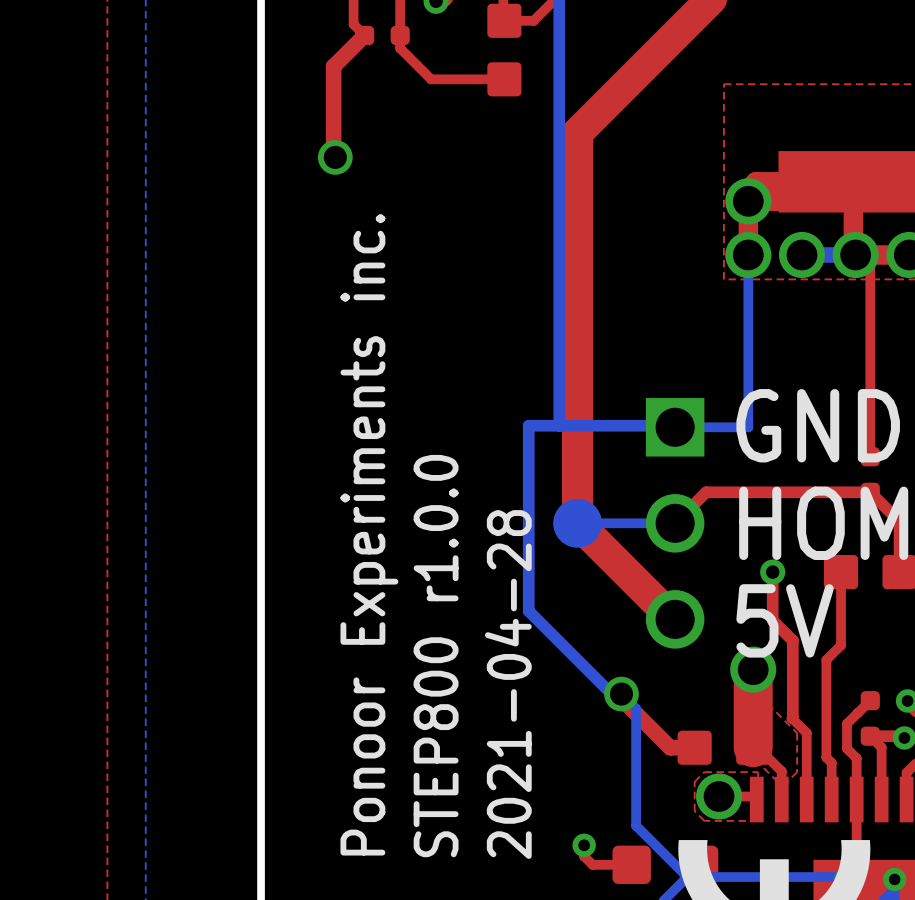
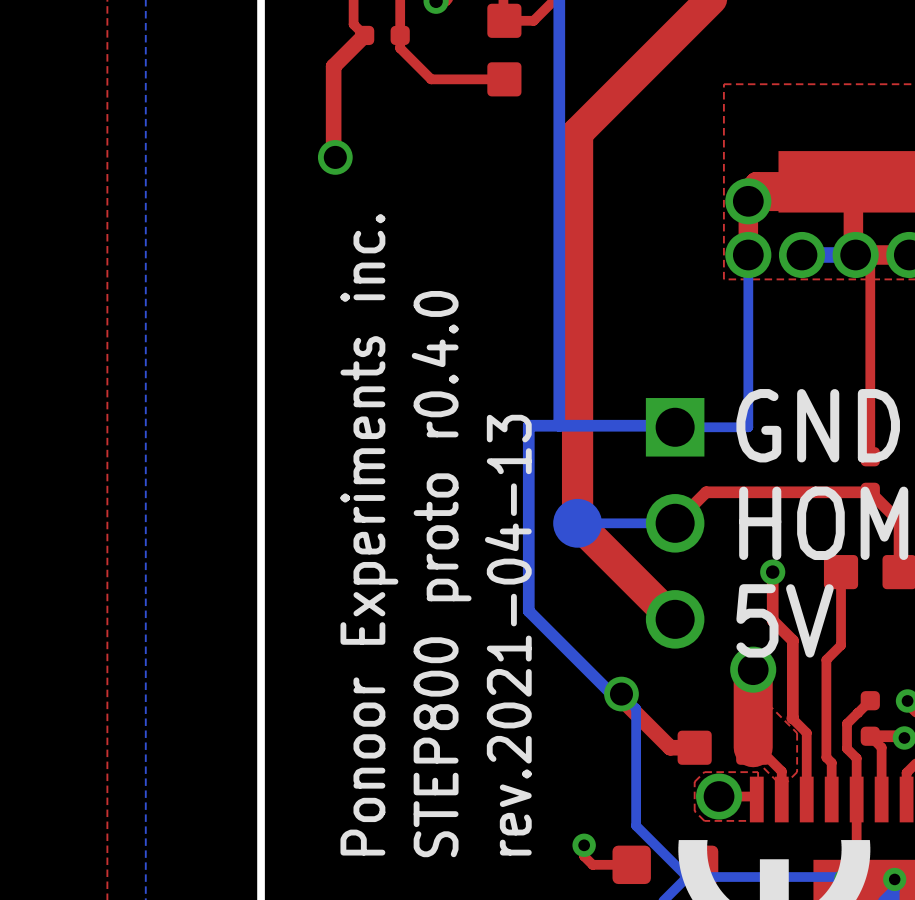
text: STEP800 r1.0.0 (436, 656) -> STEP800 proto r0.4.0 (441, 574)
text: 2021-04-28 (508, 684) -> rev.2021-04-13 (508, 635)

